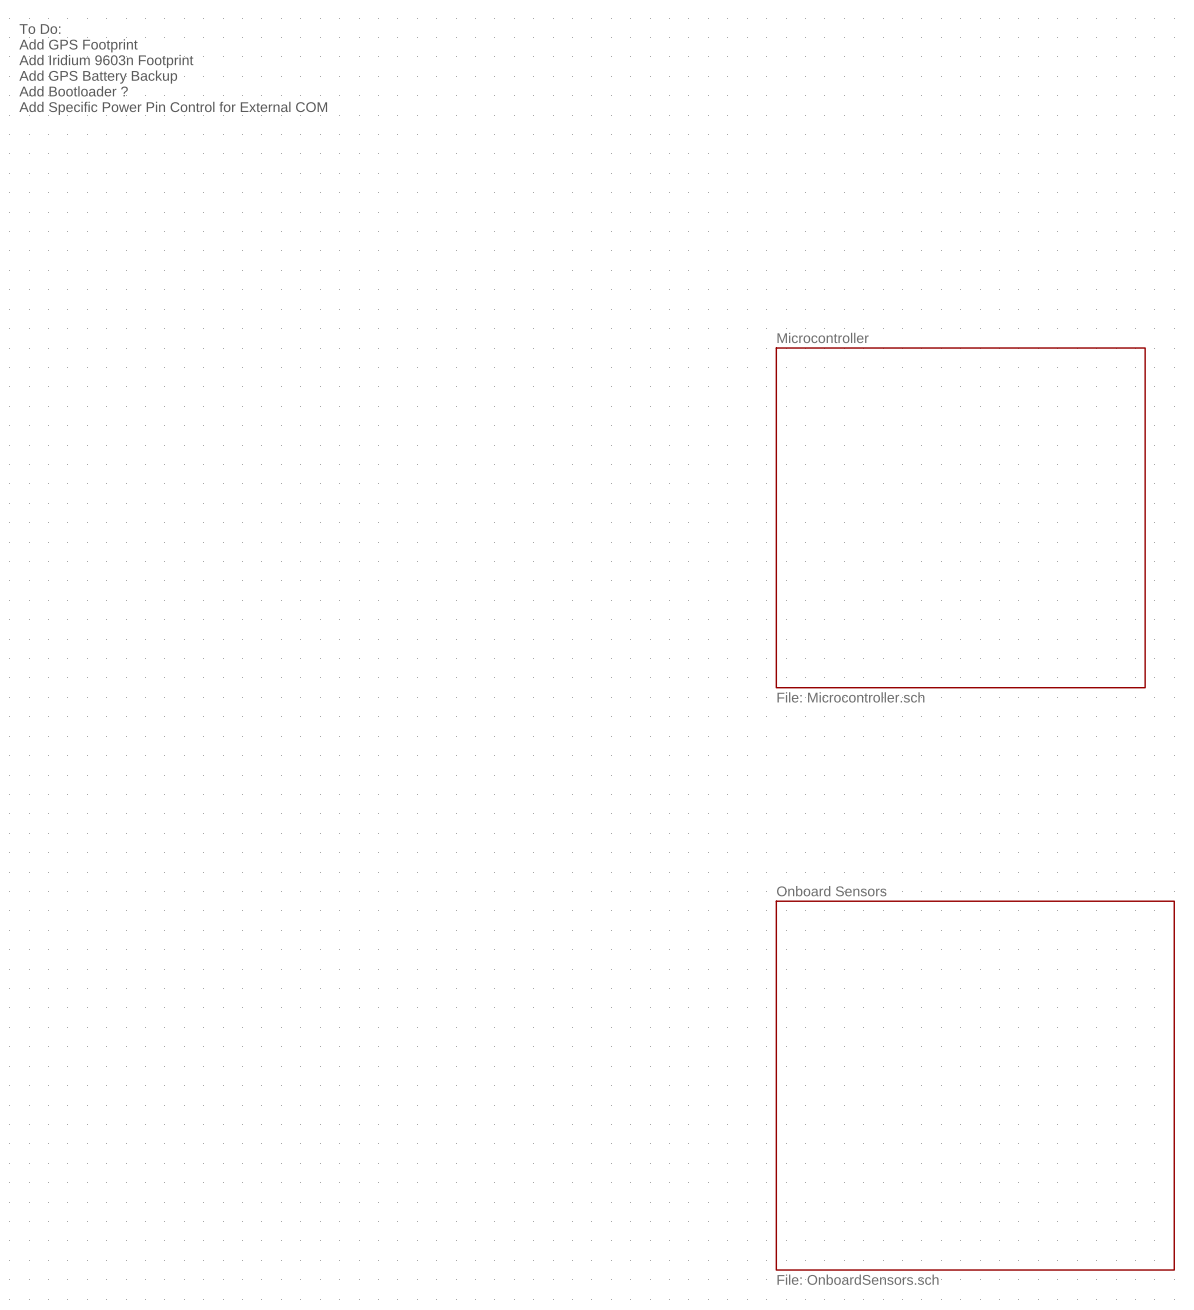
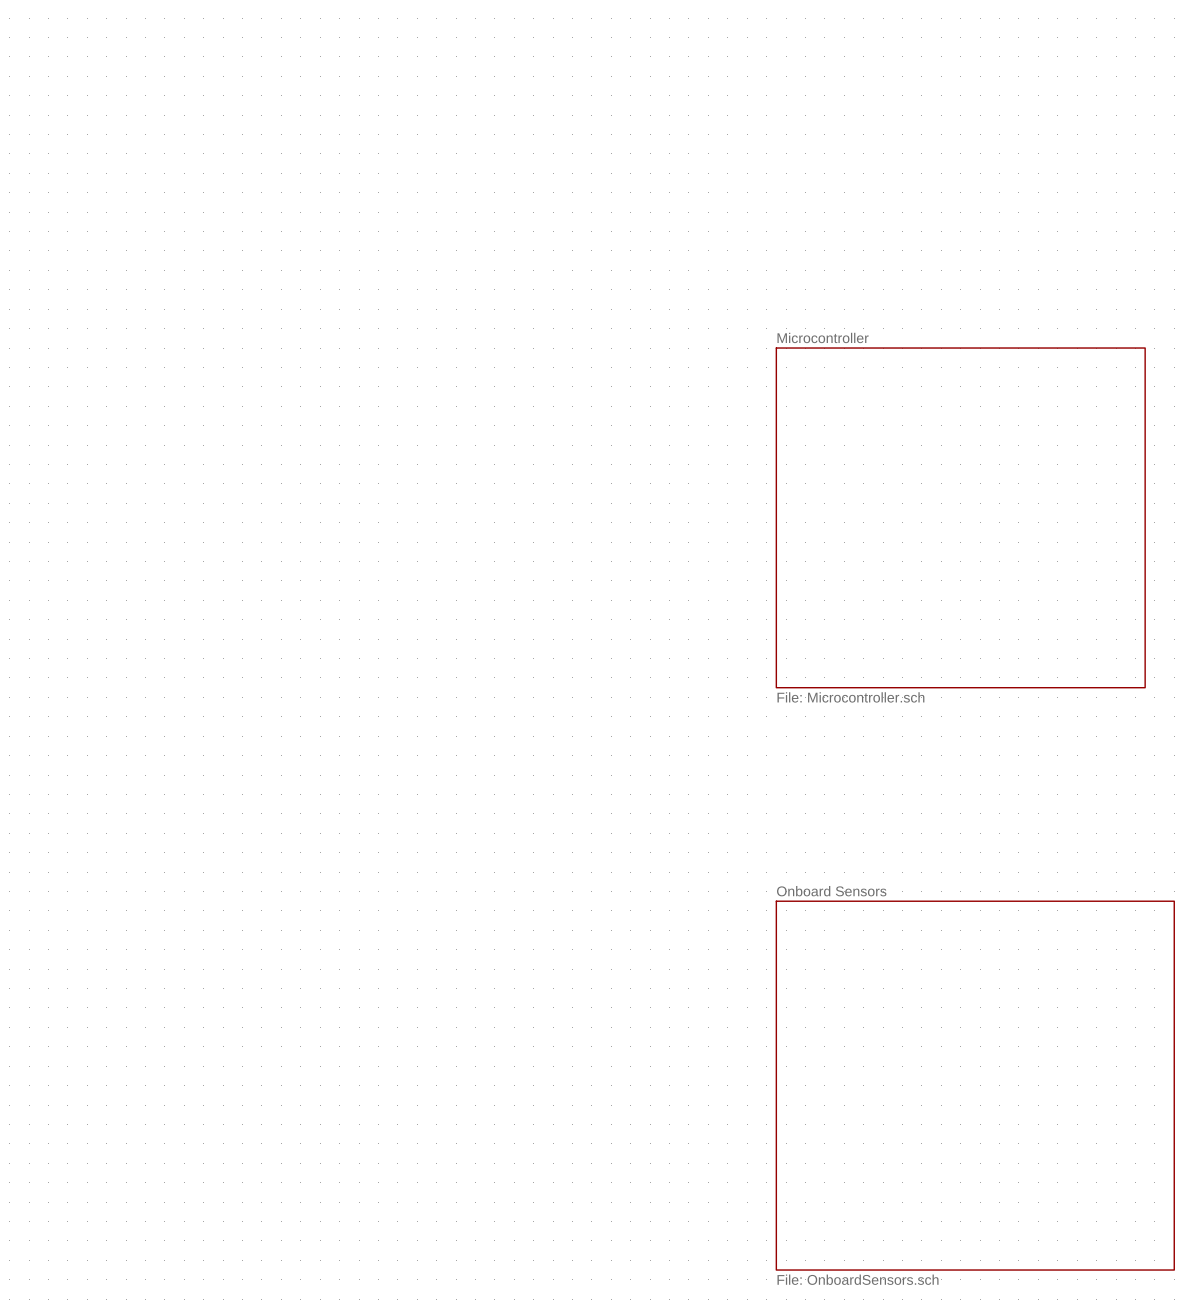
text: To Do: (40, 29) -> none
text: Add GPS Footprint (78, 45) -> none
text: Add Iridium 9603n Footprint (106, 61) -> none
text: Add GPS Battery Backup (98, 77) -> none
text: Add Bootloader ? (73, 91) -> none
text: Add Specific Power Pin Control for External COM (173, 108) -> none

